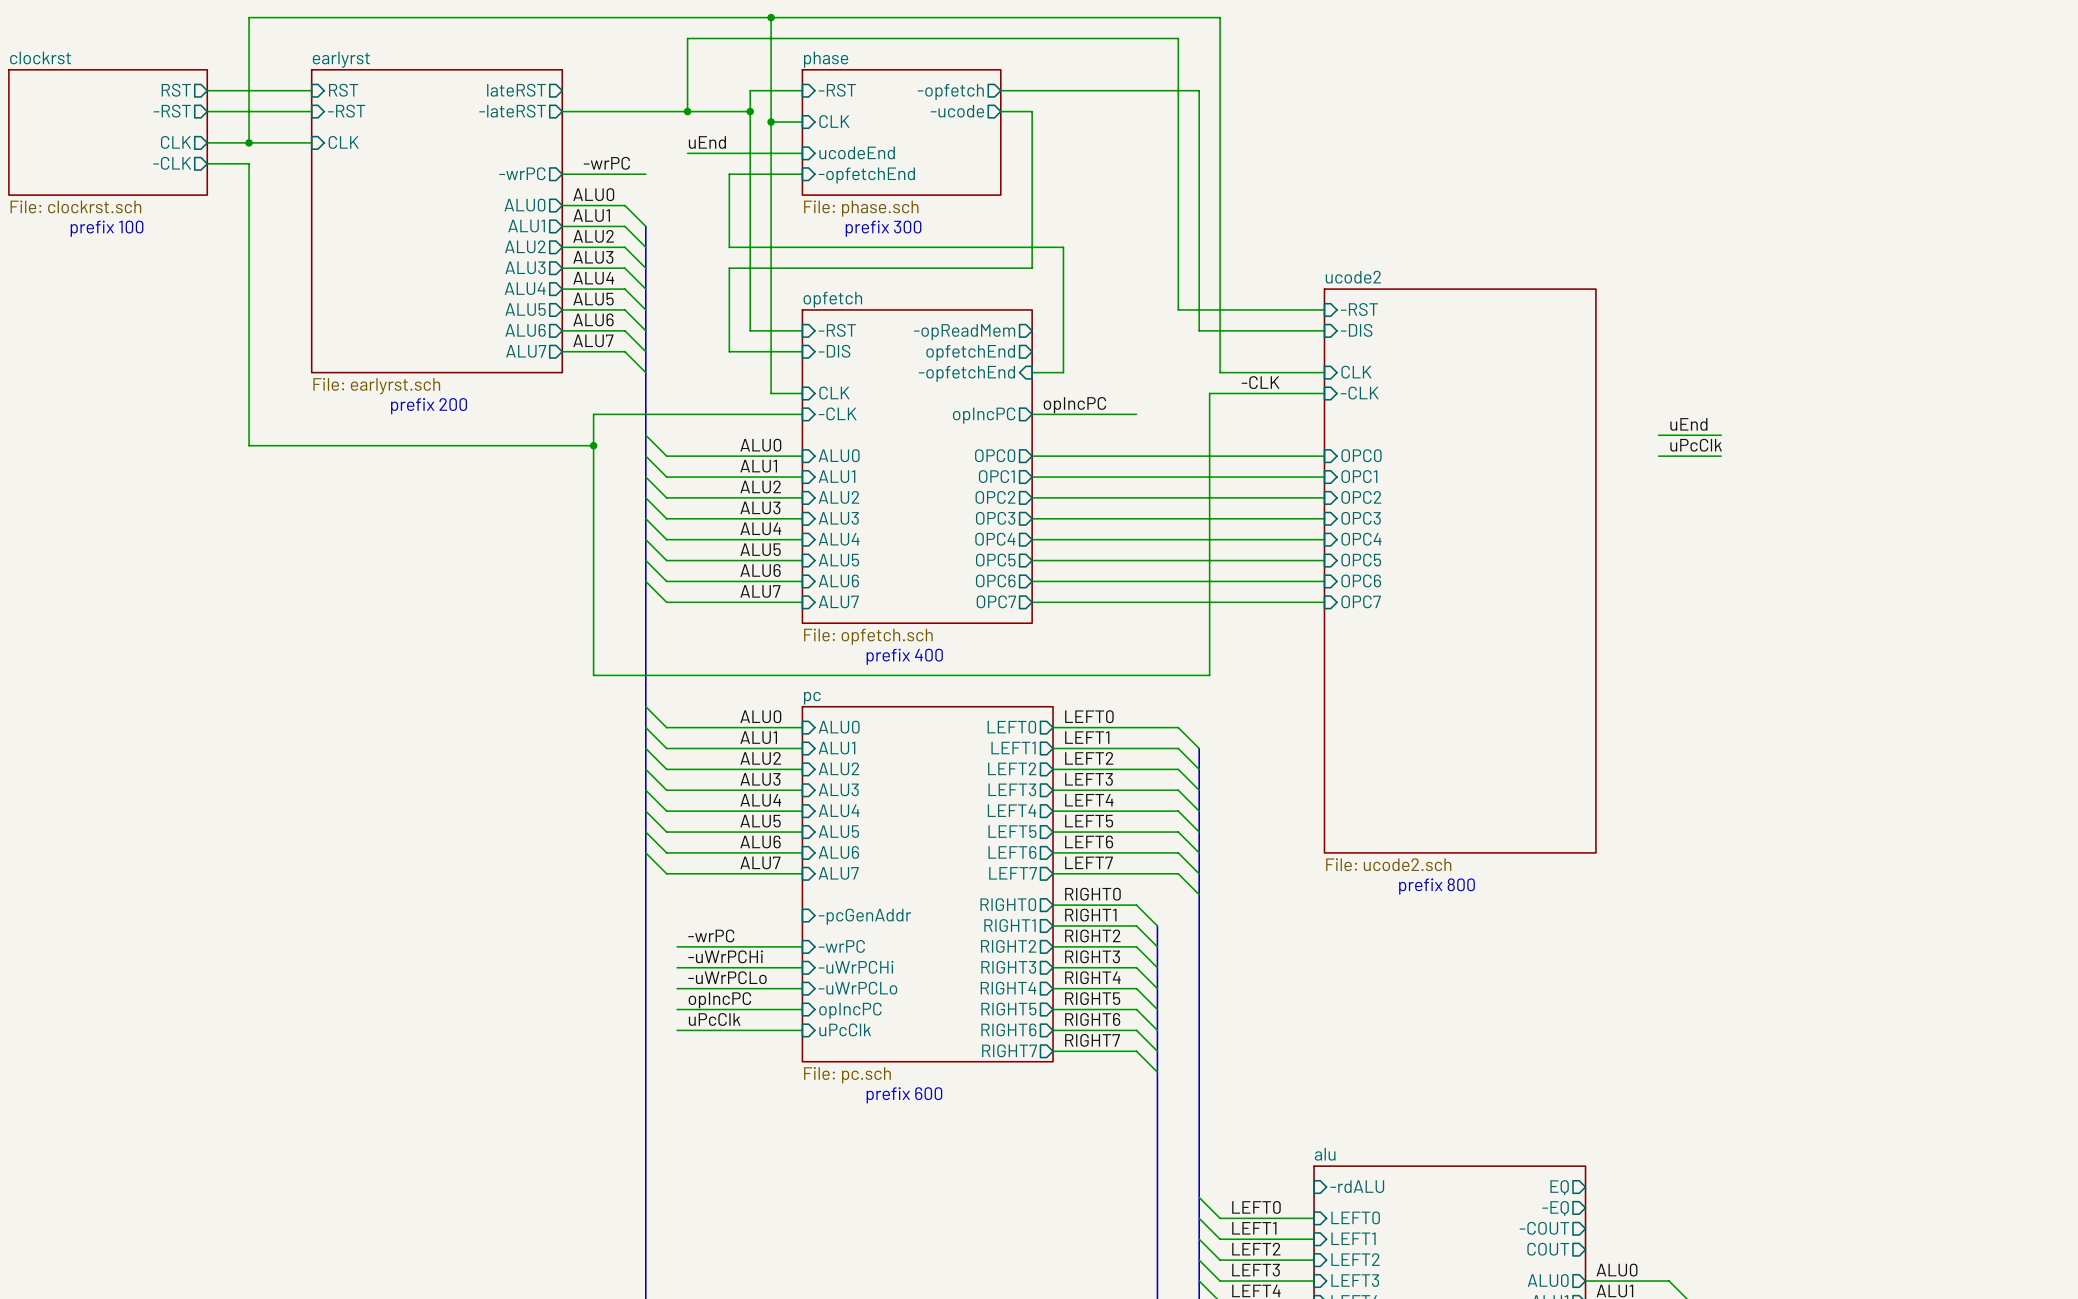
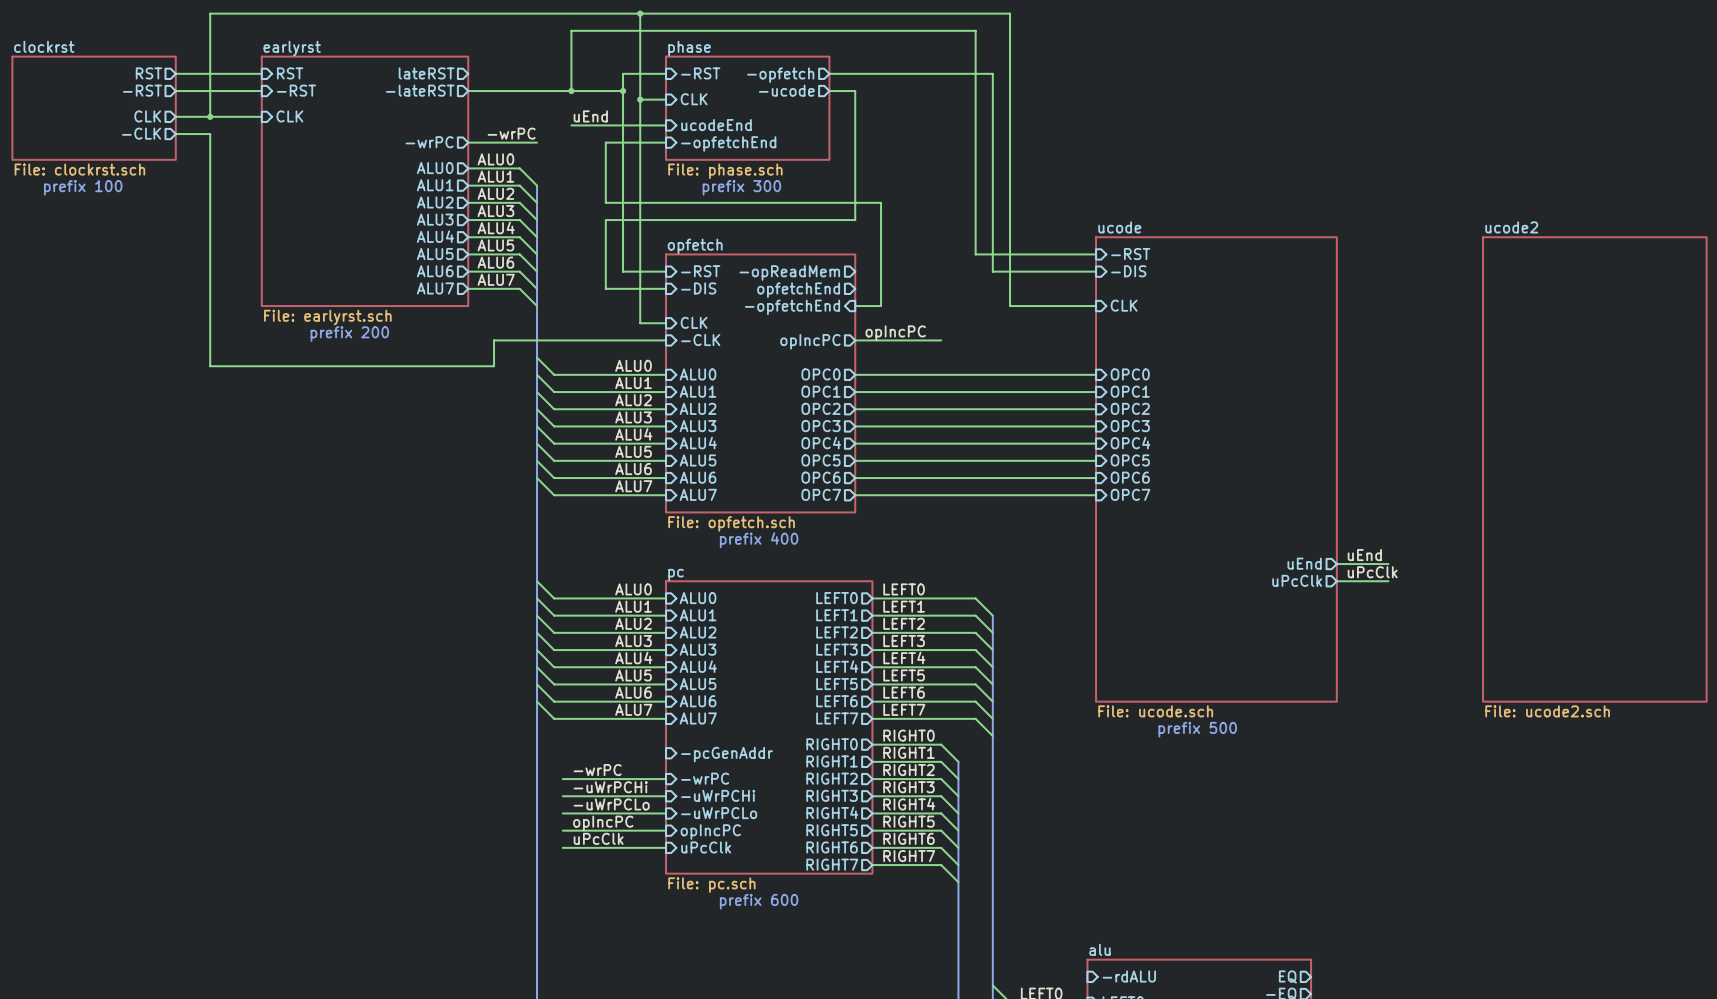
label: -CLK (1260, 382) -> none
wire: (1324, 393) (1209, 393) (1209, 675) (593, 675) (593, 445) -> none
sheet pin: -CLK (1359, 393) -> none
label: uEnd (1688, 424) -> none
wire: (1658, 435) (1721, 435) -> none
junction: (593, 445) -> none
label: uPcClk (1696, 445) -> none
wire: (1658, 456) (1721, 456) -> none
sheet ucode2 position: (1460, 571) -> (1594, 469)
sheet ucode: none -> File: ucode.sch (1216, 469)
label: none -> uEnd (1364, 555)
sheet pin: none -> uEnd (1304, 563)
wire: none -> (1336, 564) (1388, 564)
label: none -> uPcClk (1372, 572)
sheet pin: none -> uPcClk (1297, 580)
wire: none -> (1336, 581) (1388, 581)
text: prefix 800 (1436, 886) -> prefix 500 (1197, 729)

